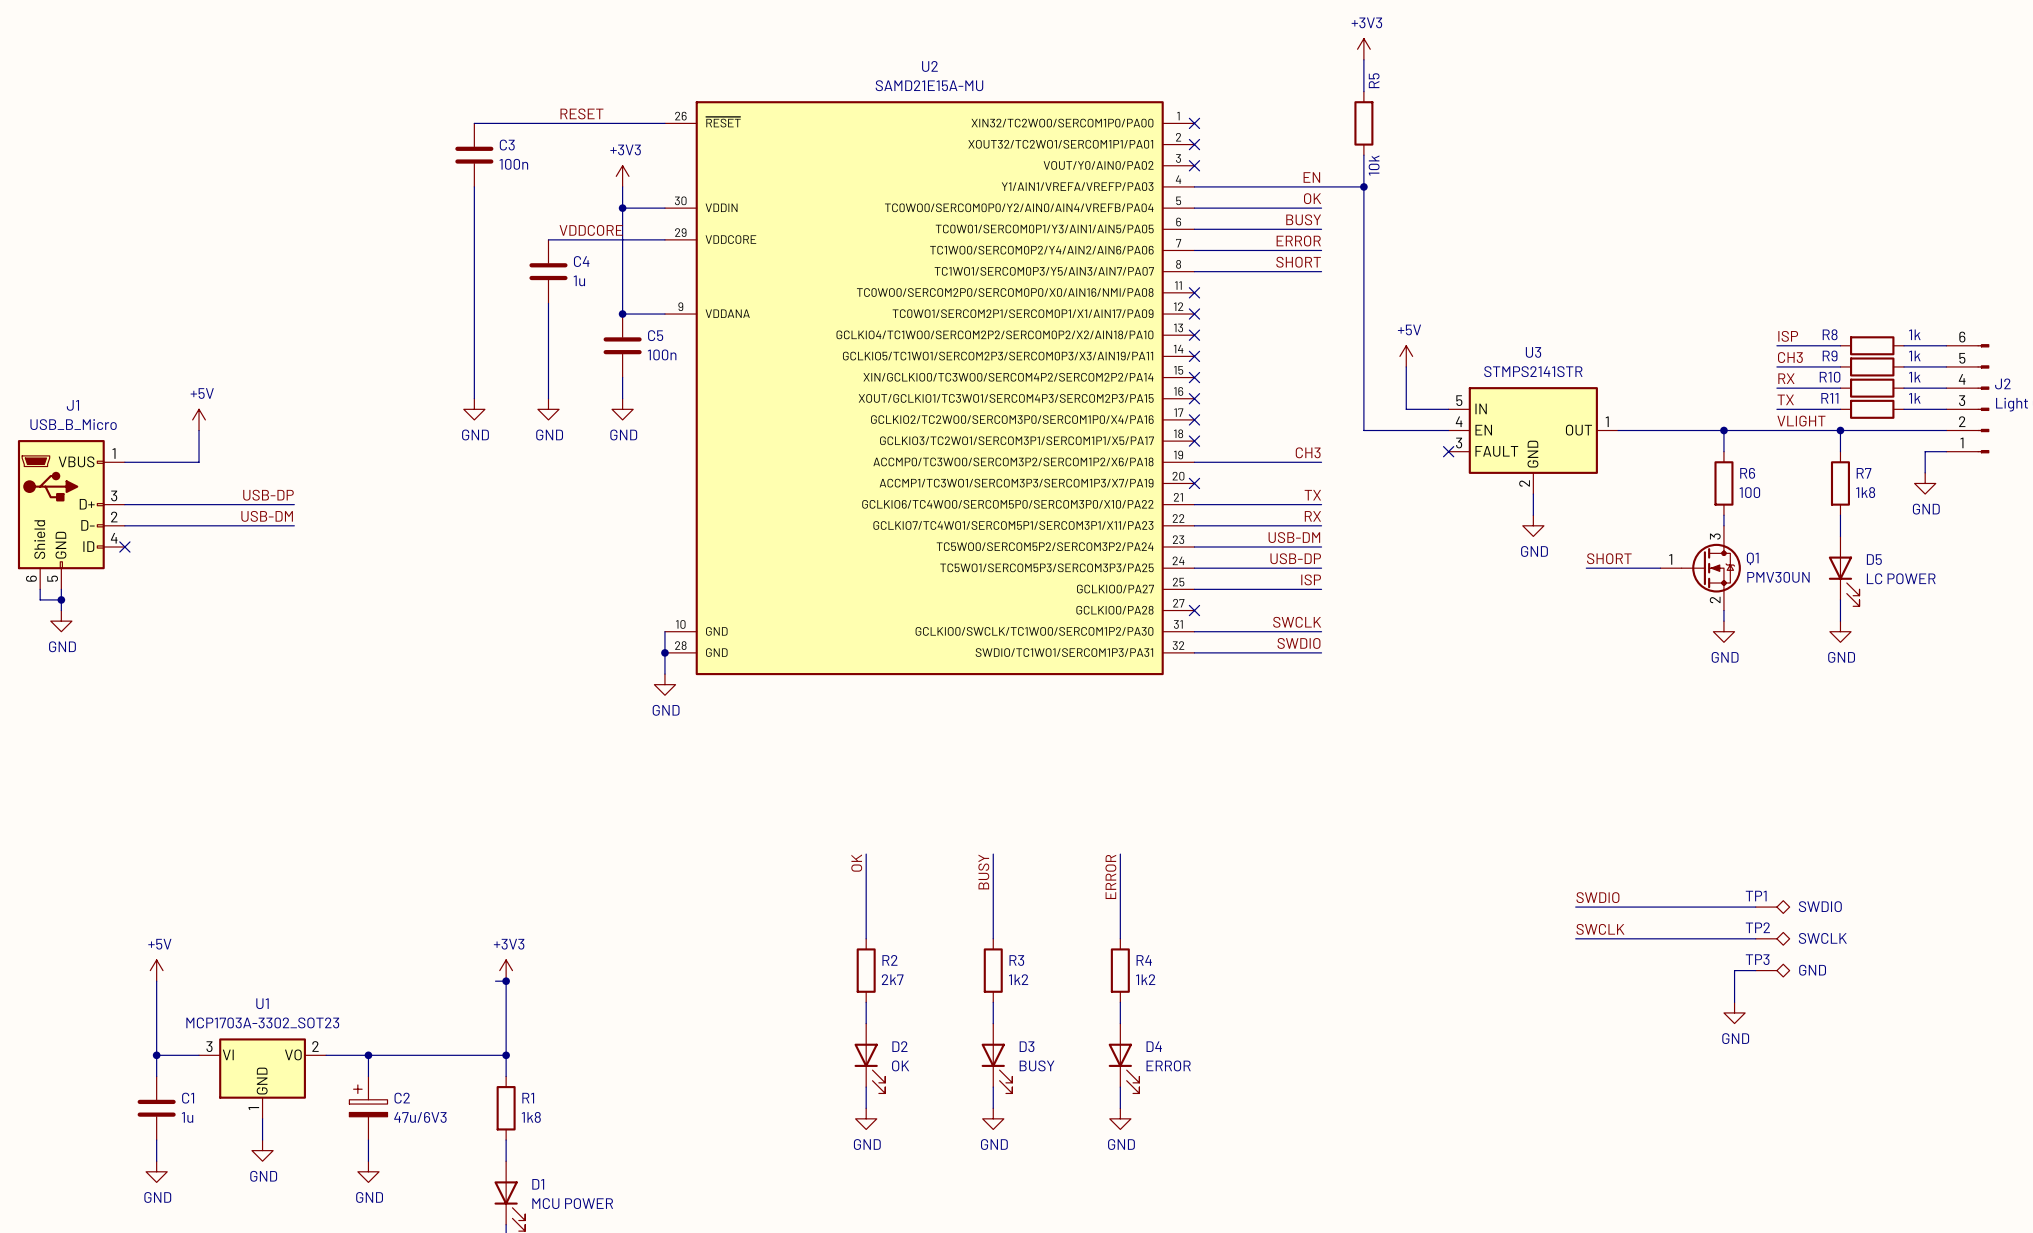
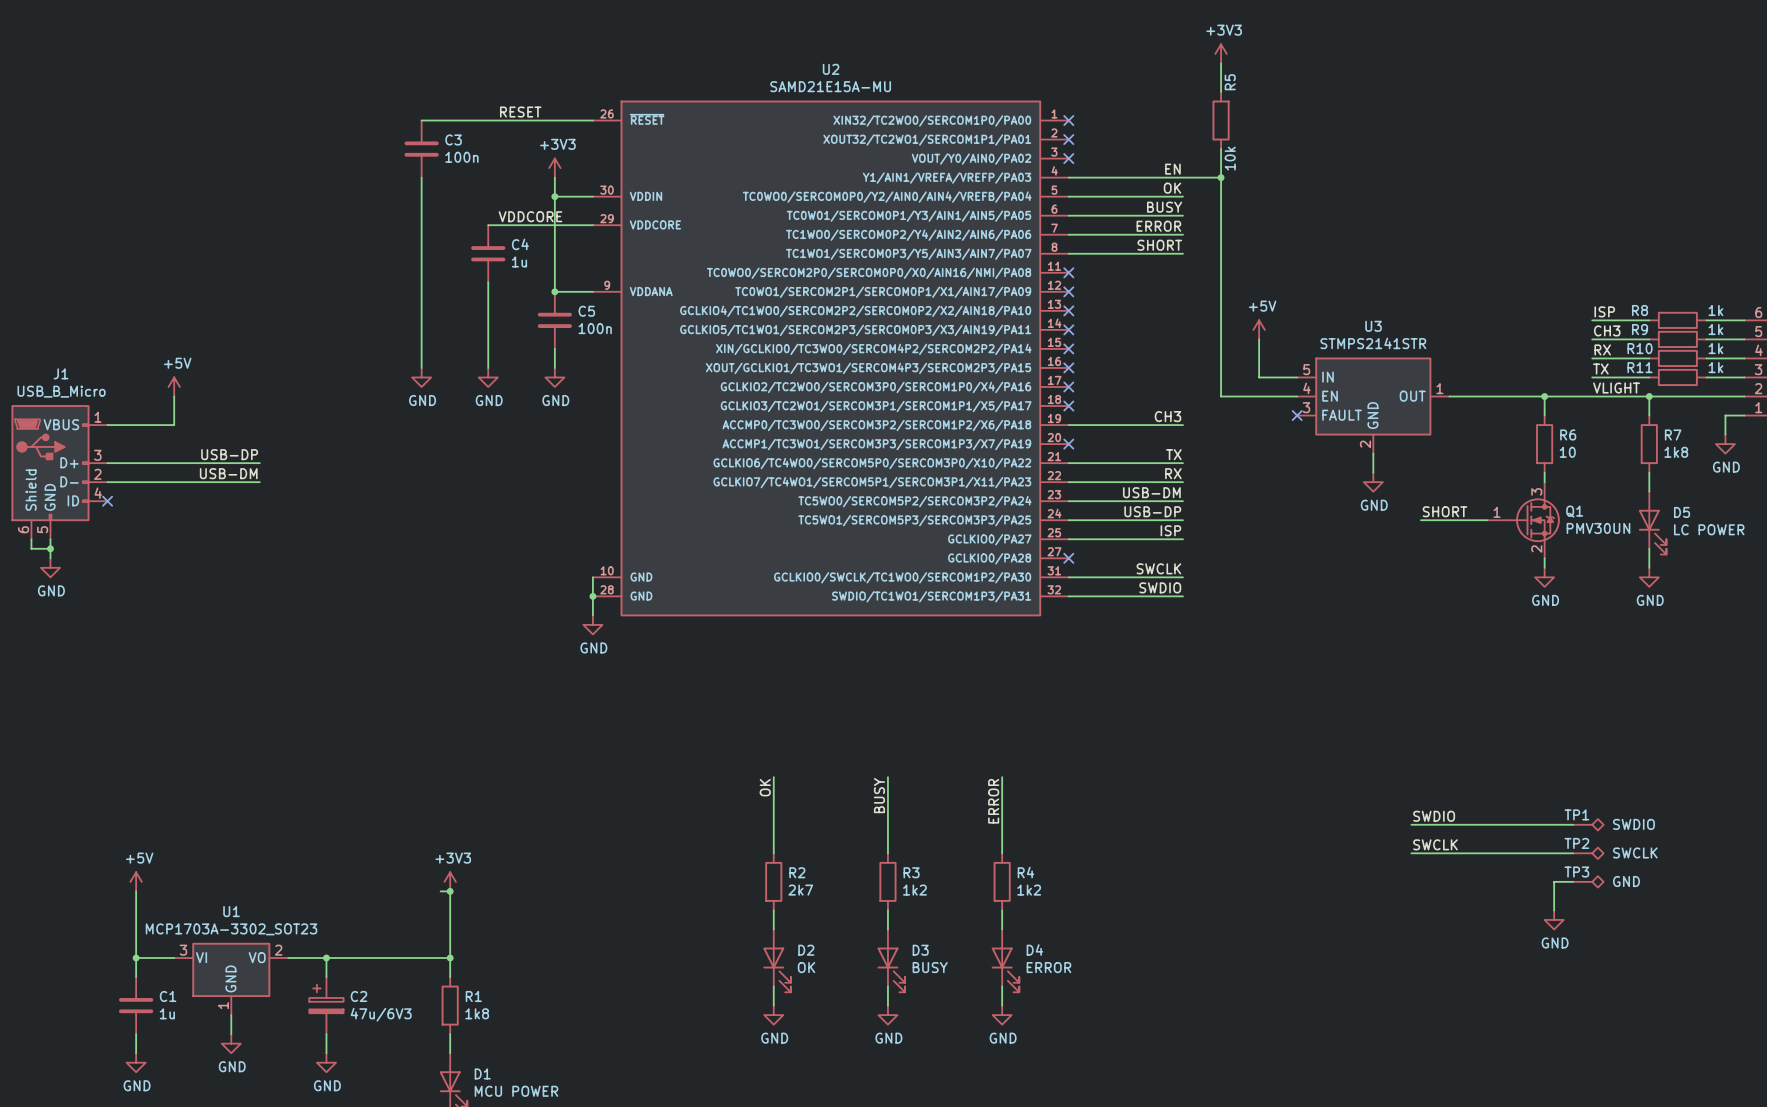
R6 value: 100 (1749, 492) -> 10 (1567, 452)

